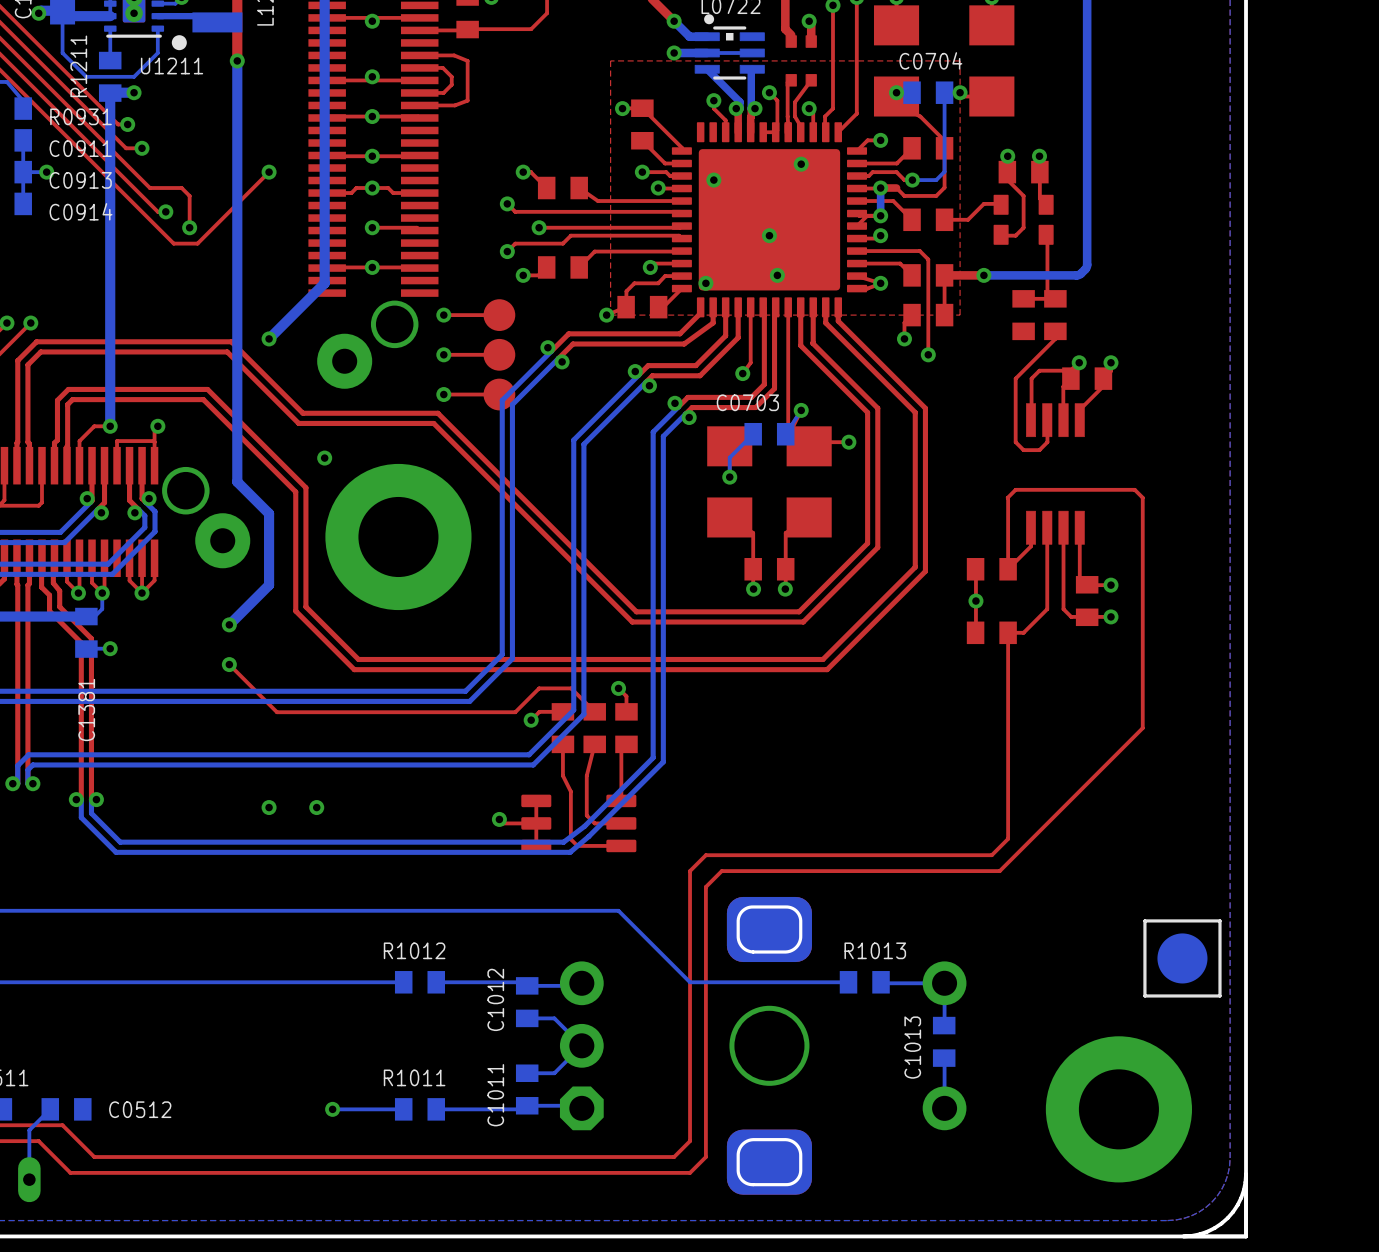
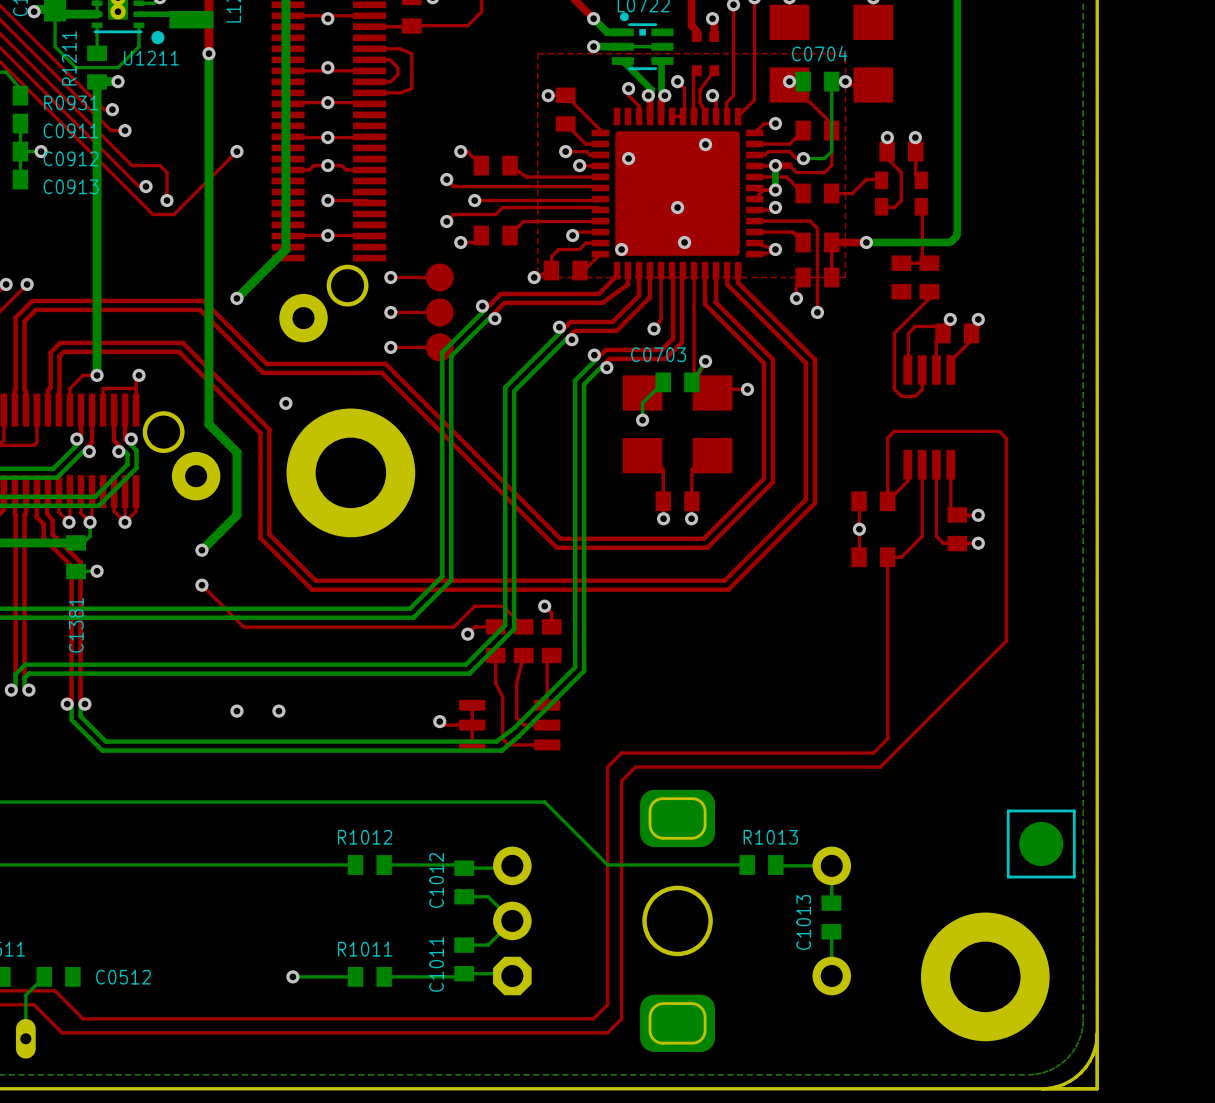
C0913 name: C0913 (80, 180) -> C0912 (71, 158)
C0914 name: C0914 (81, 211) -> C0913 (71, 186)

